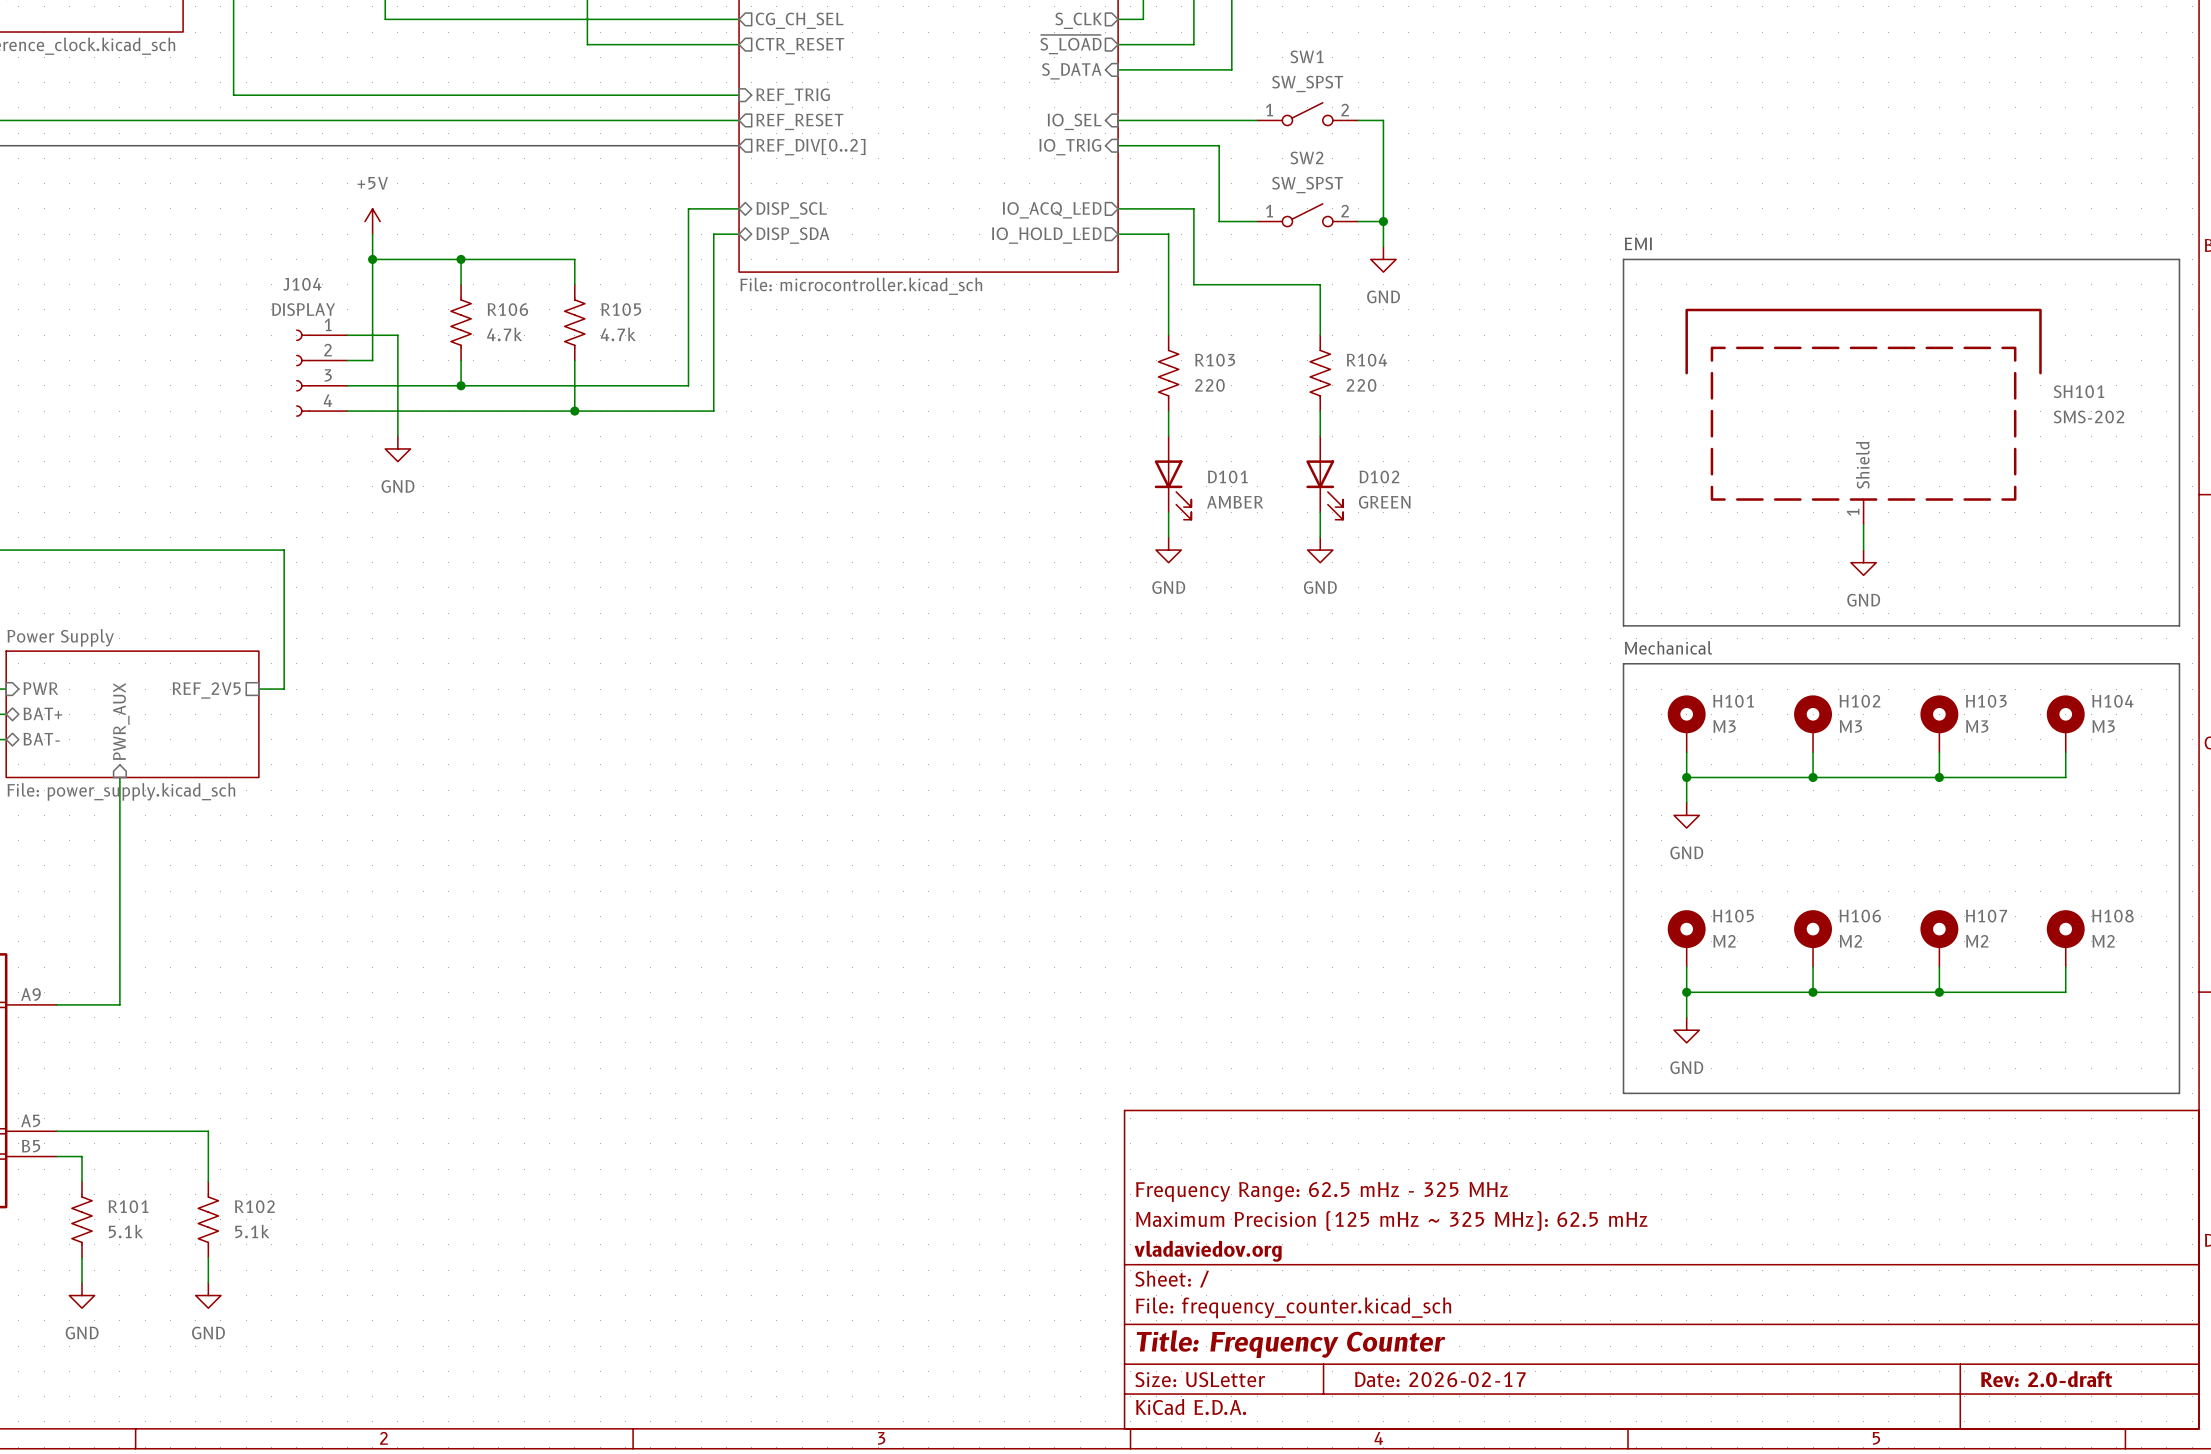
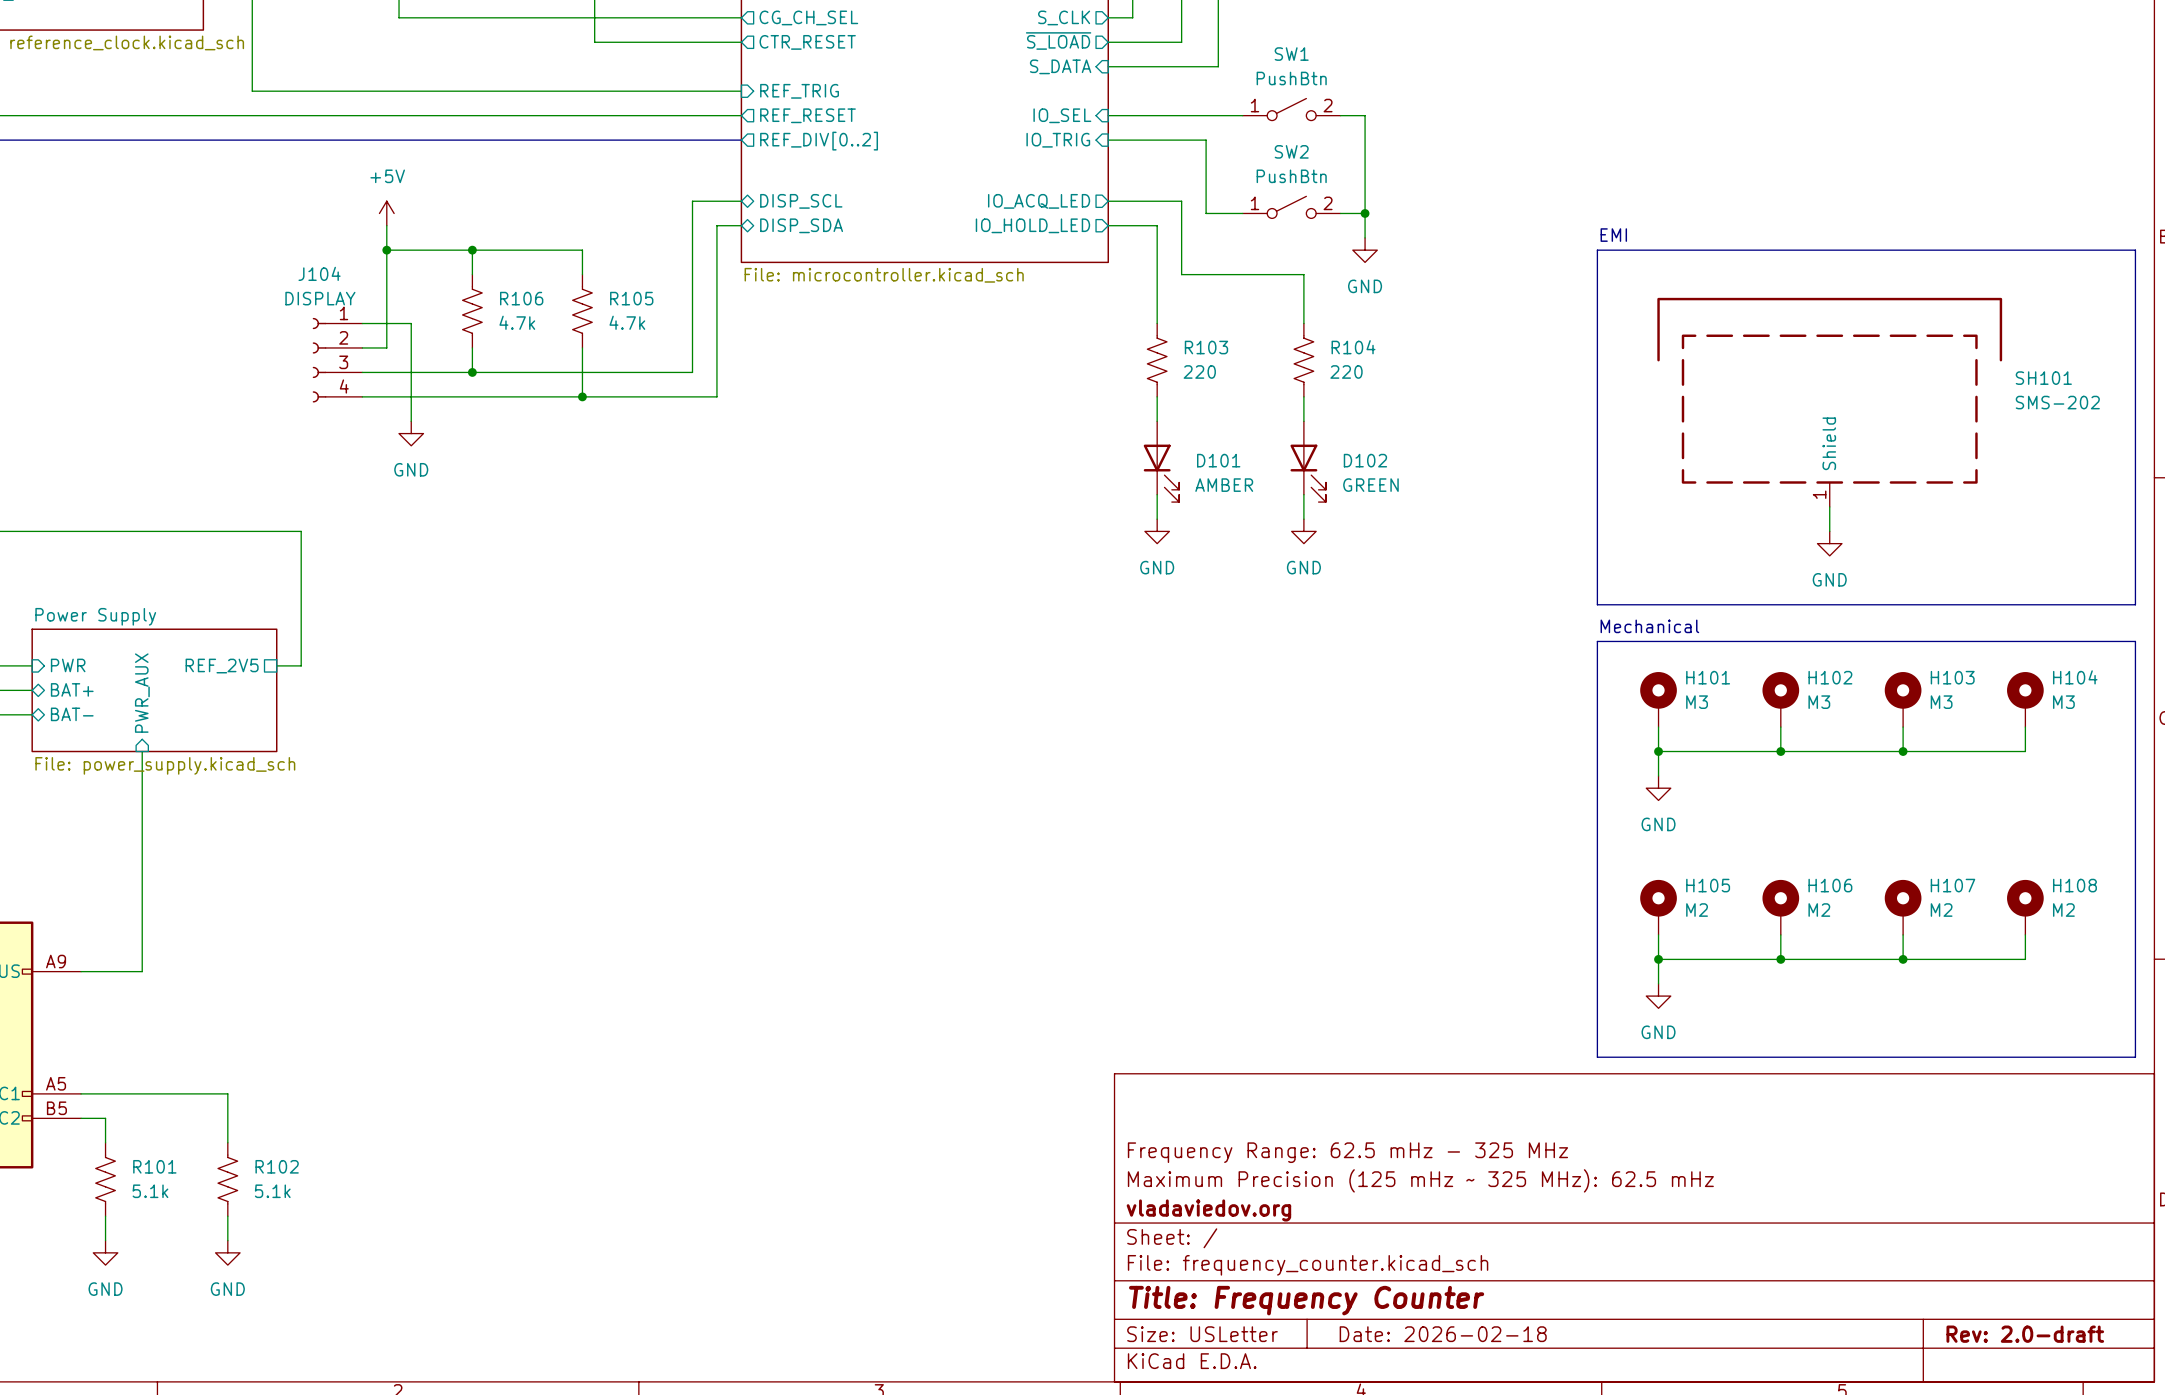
SW1 value: SW_SPST (1307, 83) -> PushBtn (1291, 78)
SW2 value: SW_SPST (1307, 185) -> PushBtn (1291, 176)
title block: Date: 2026-02-17 (1440, 1379) -> Date: 2026-02-18 (1443, 1334)

